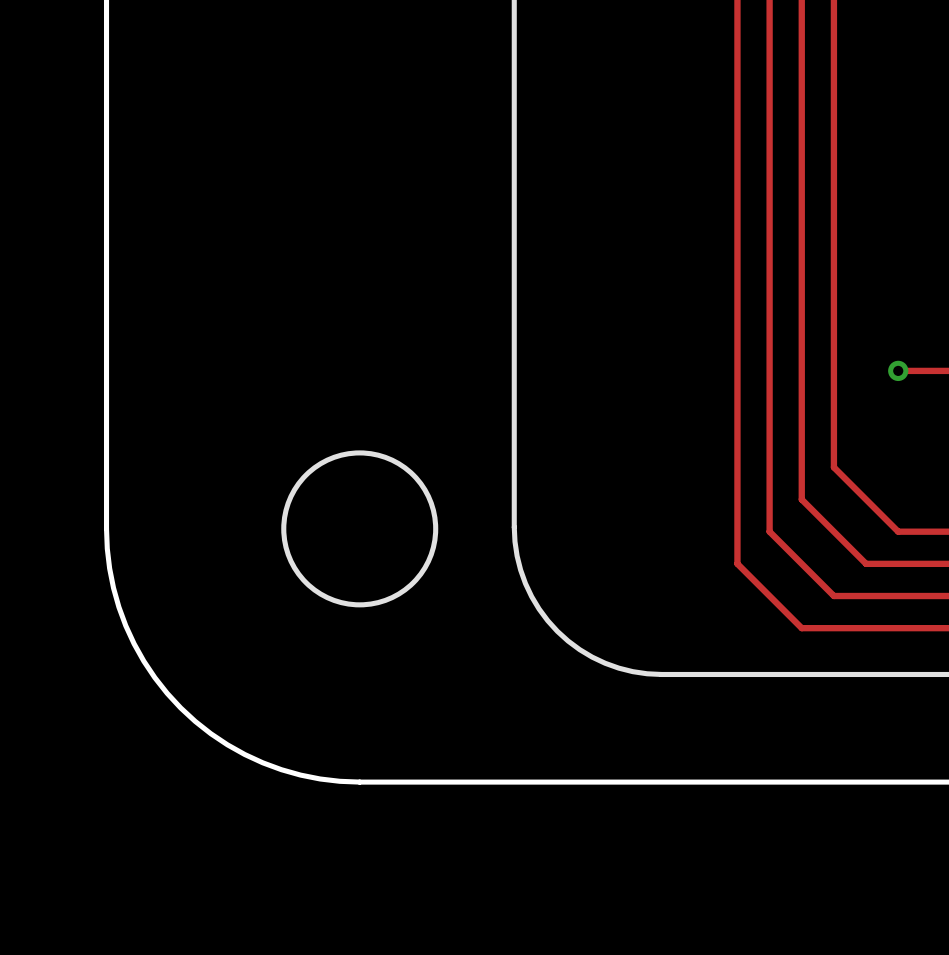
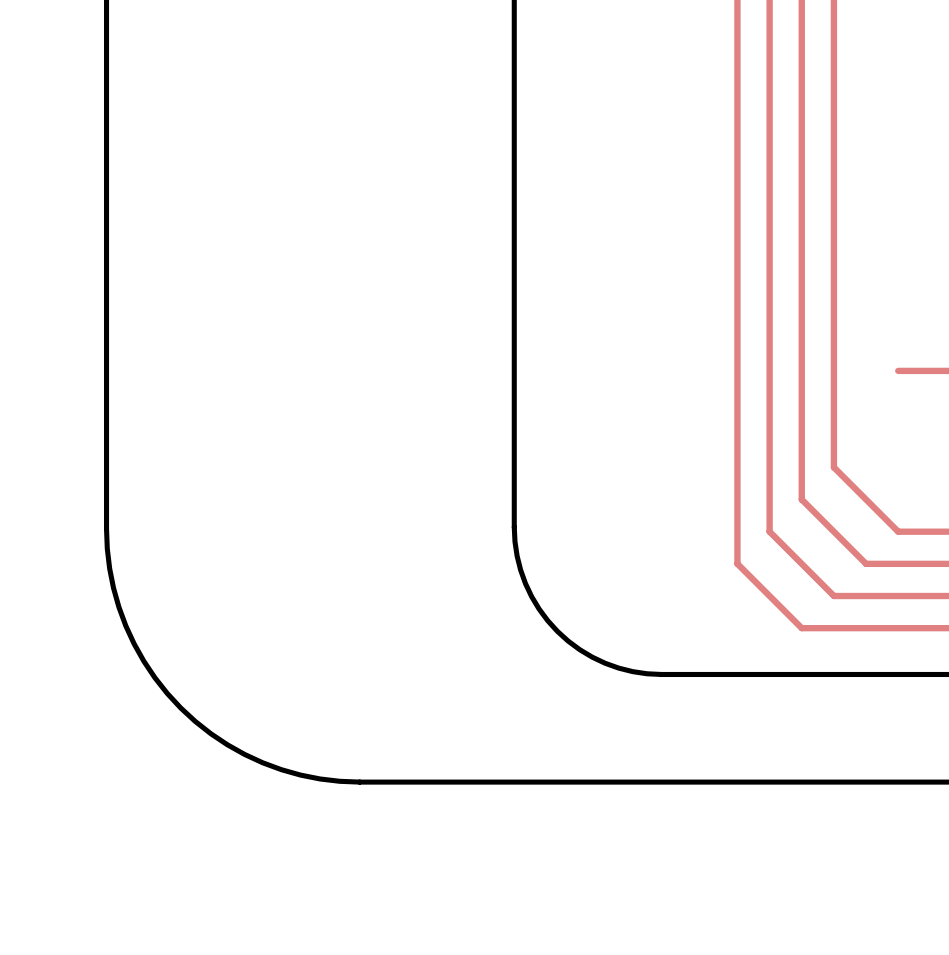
via: (898, 370) -> none
drawing: [281, 450, 439, 608] -> none

